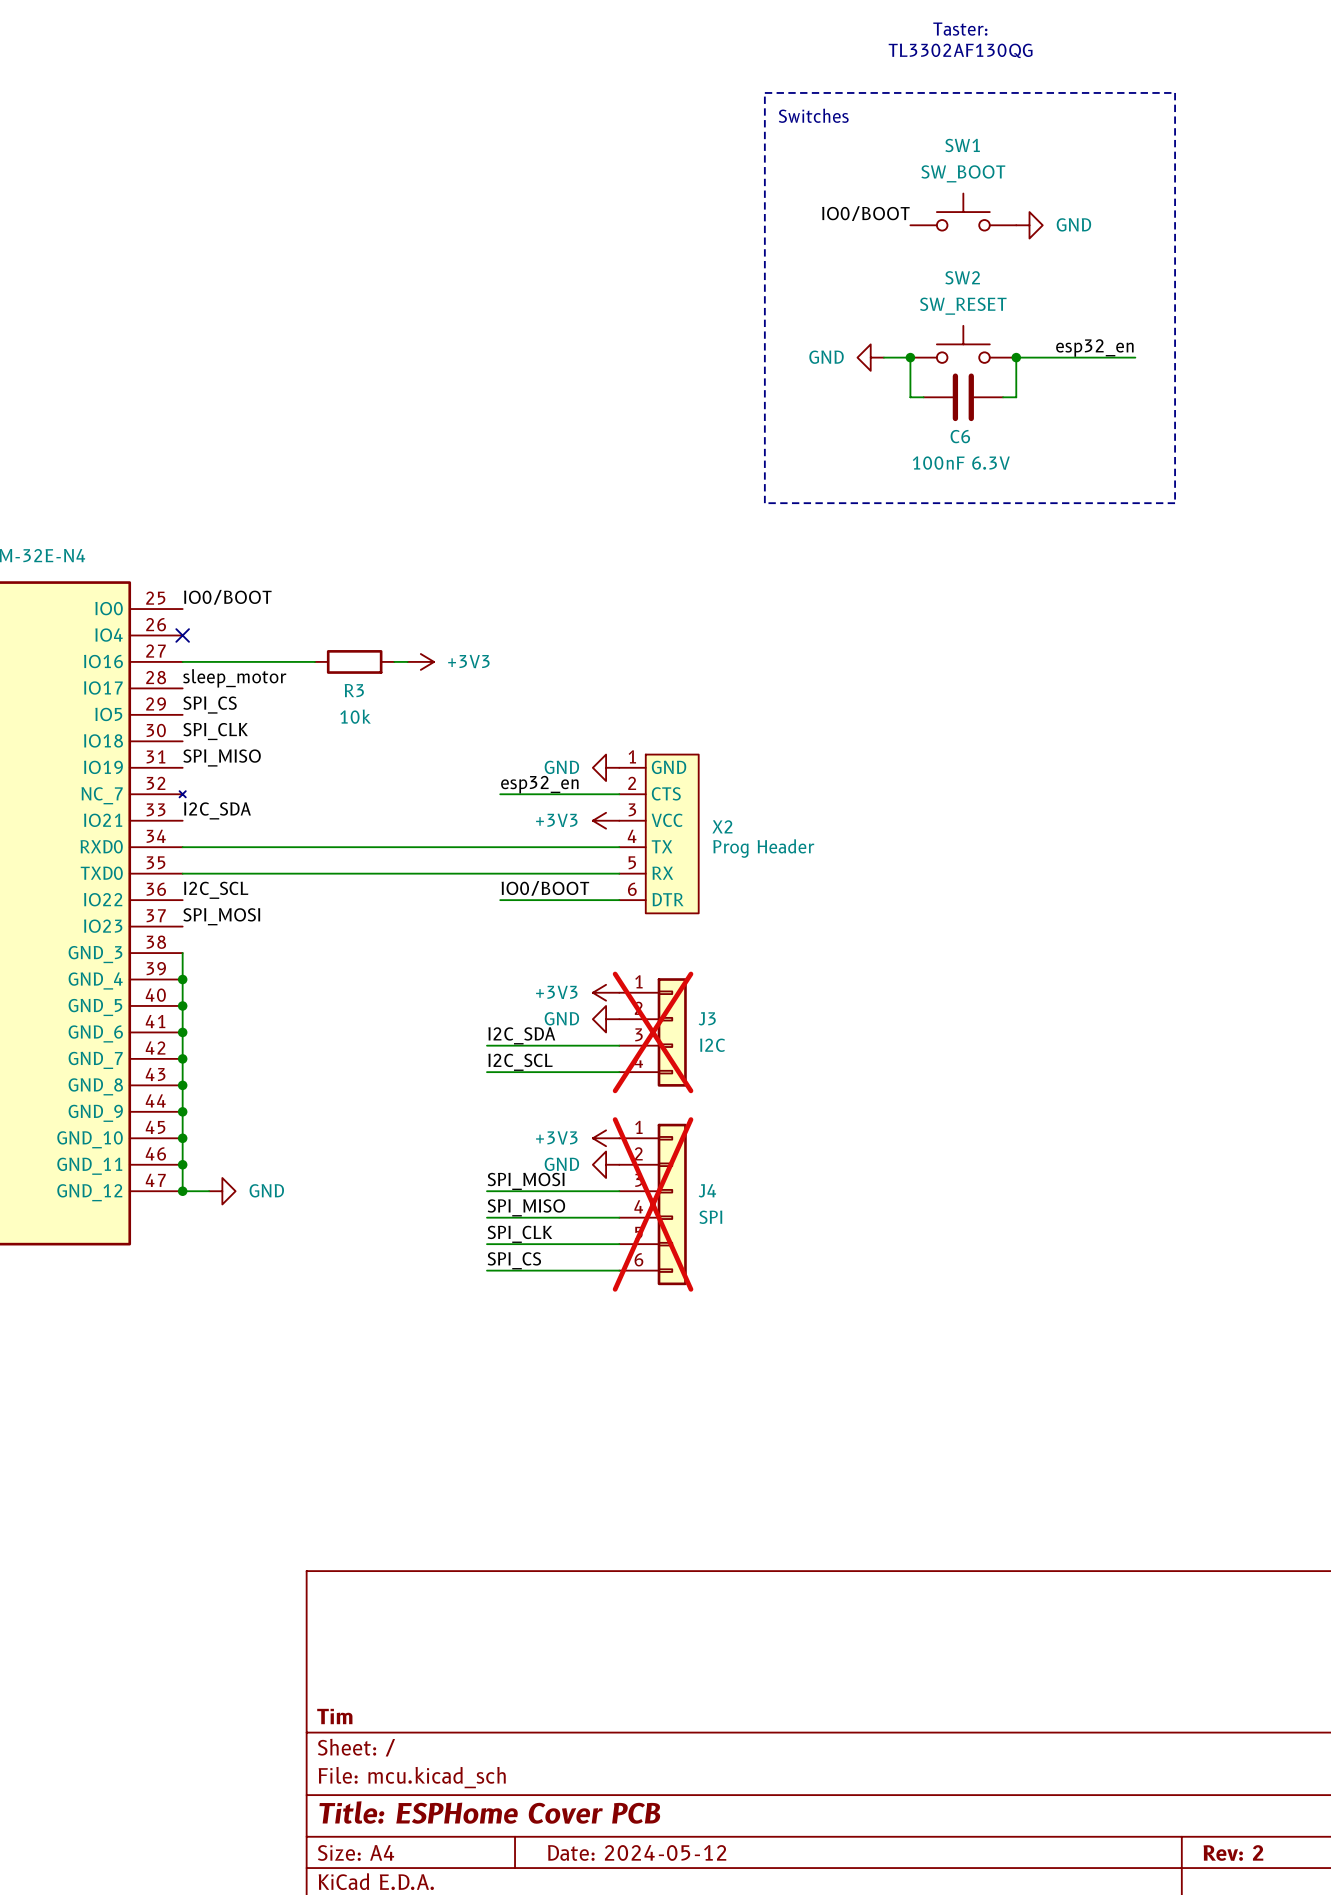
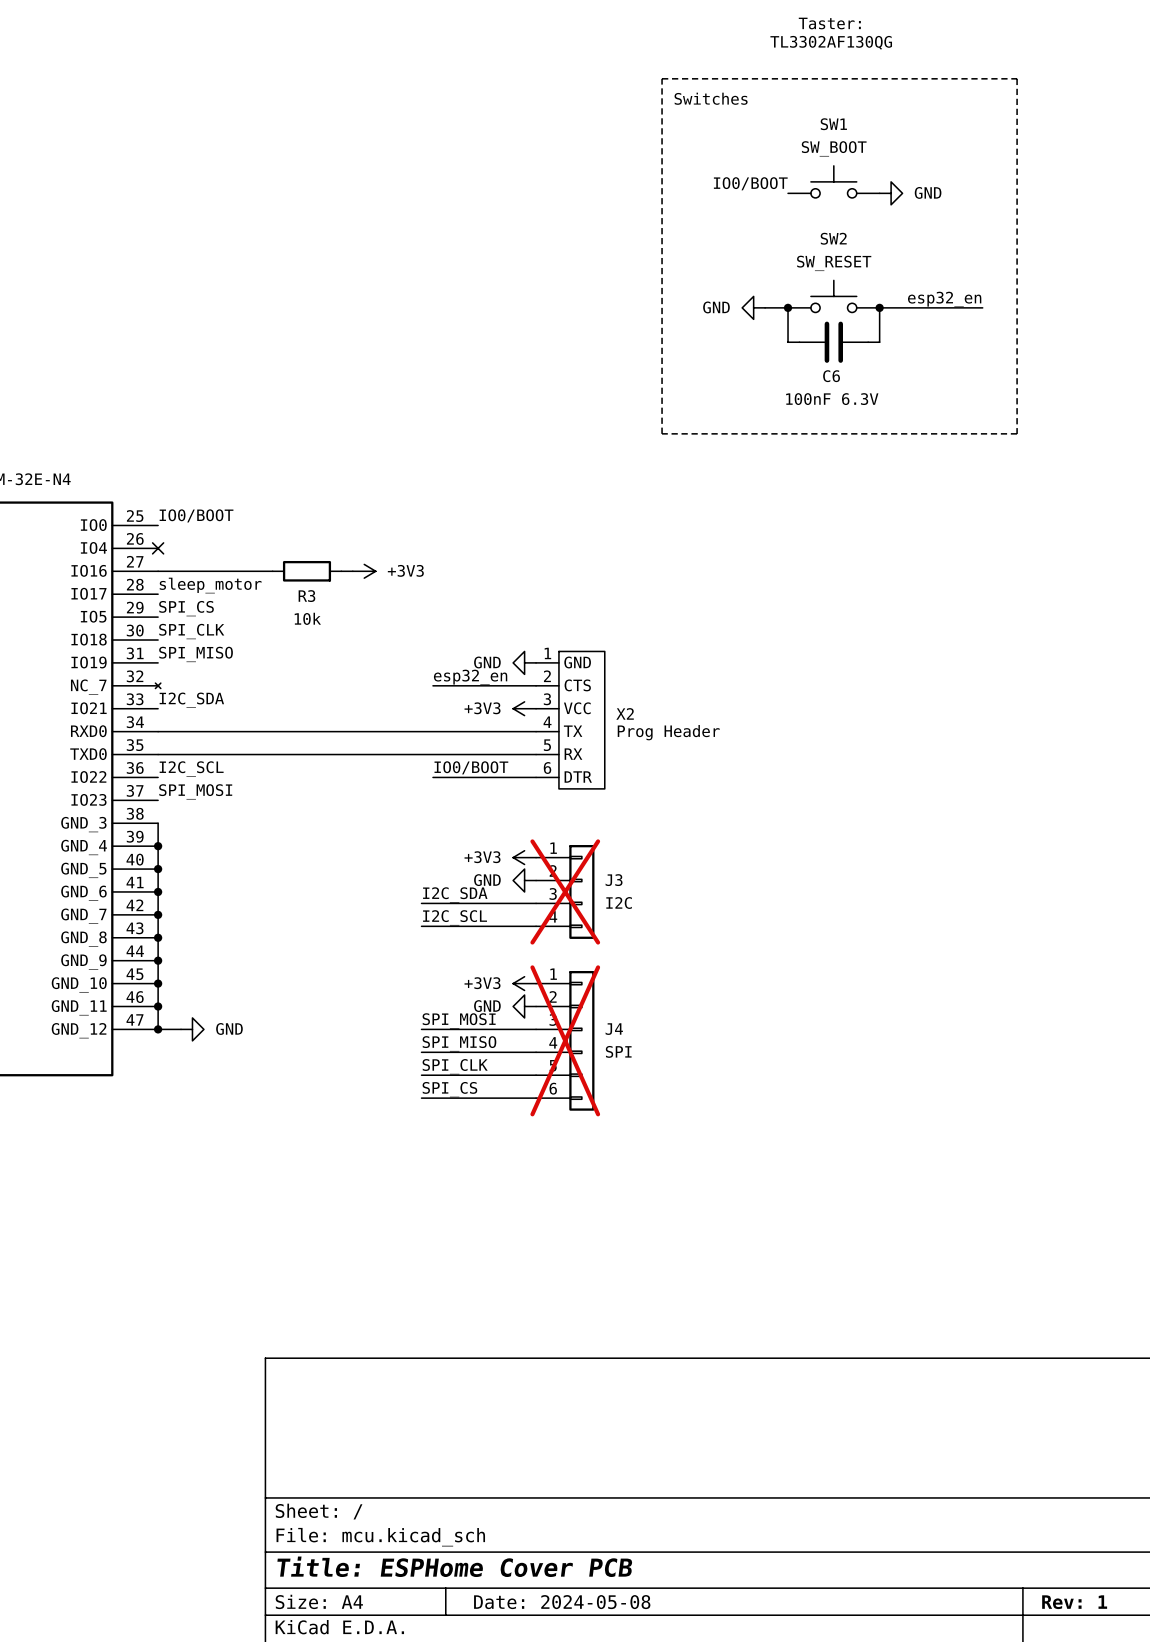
title block: Tim (334, 1716) -> none
title block: Date: 2024-05-12 (637, 1852) -> Date: 2024-05-08 (562, 1602)
title block: Rev: 2 (1233, 1853) -> Rev: 1 (1074, 1602)

